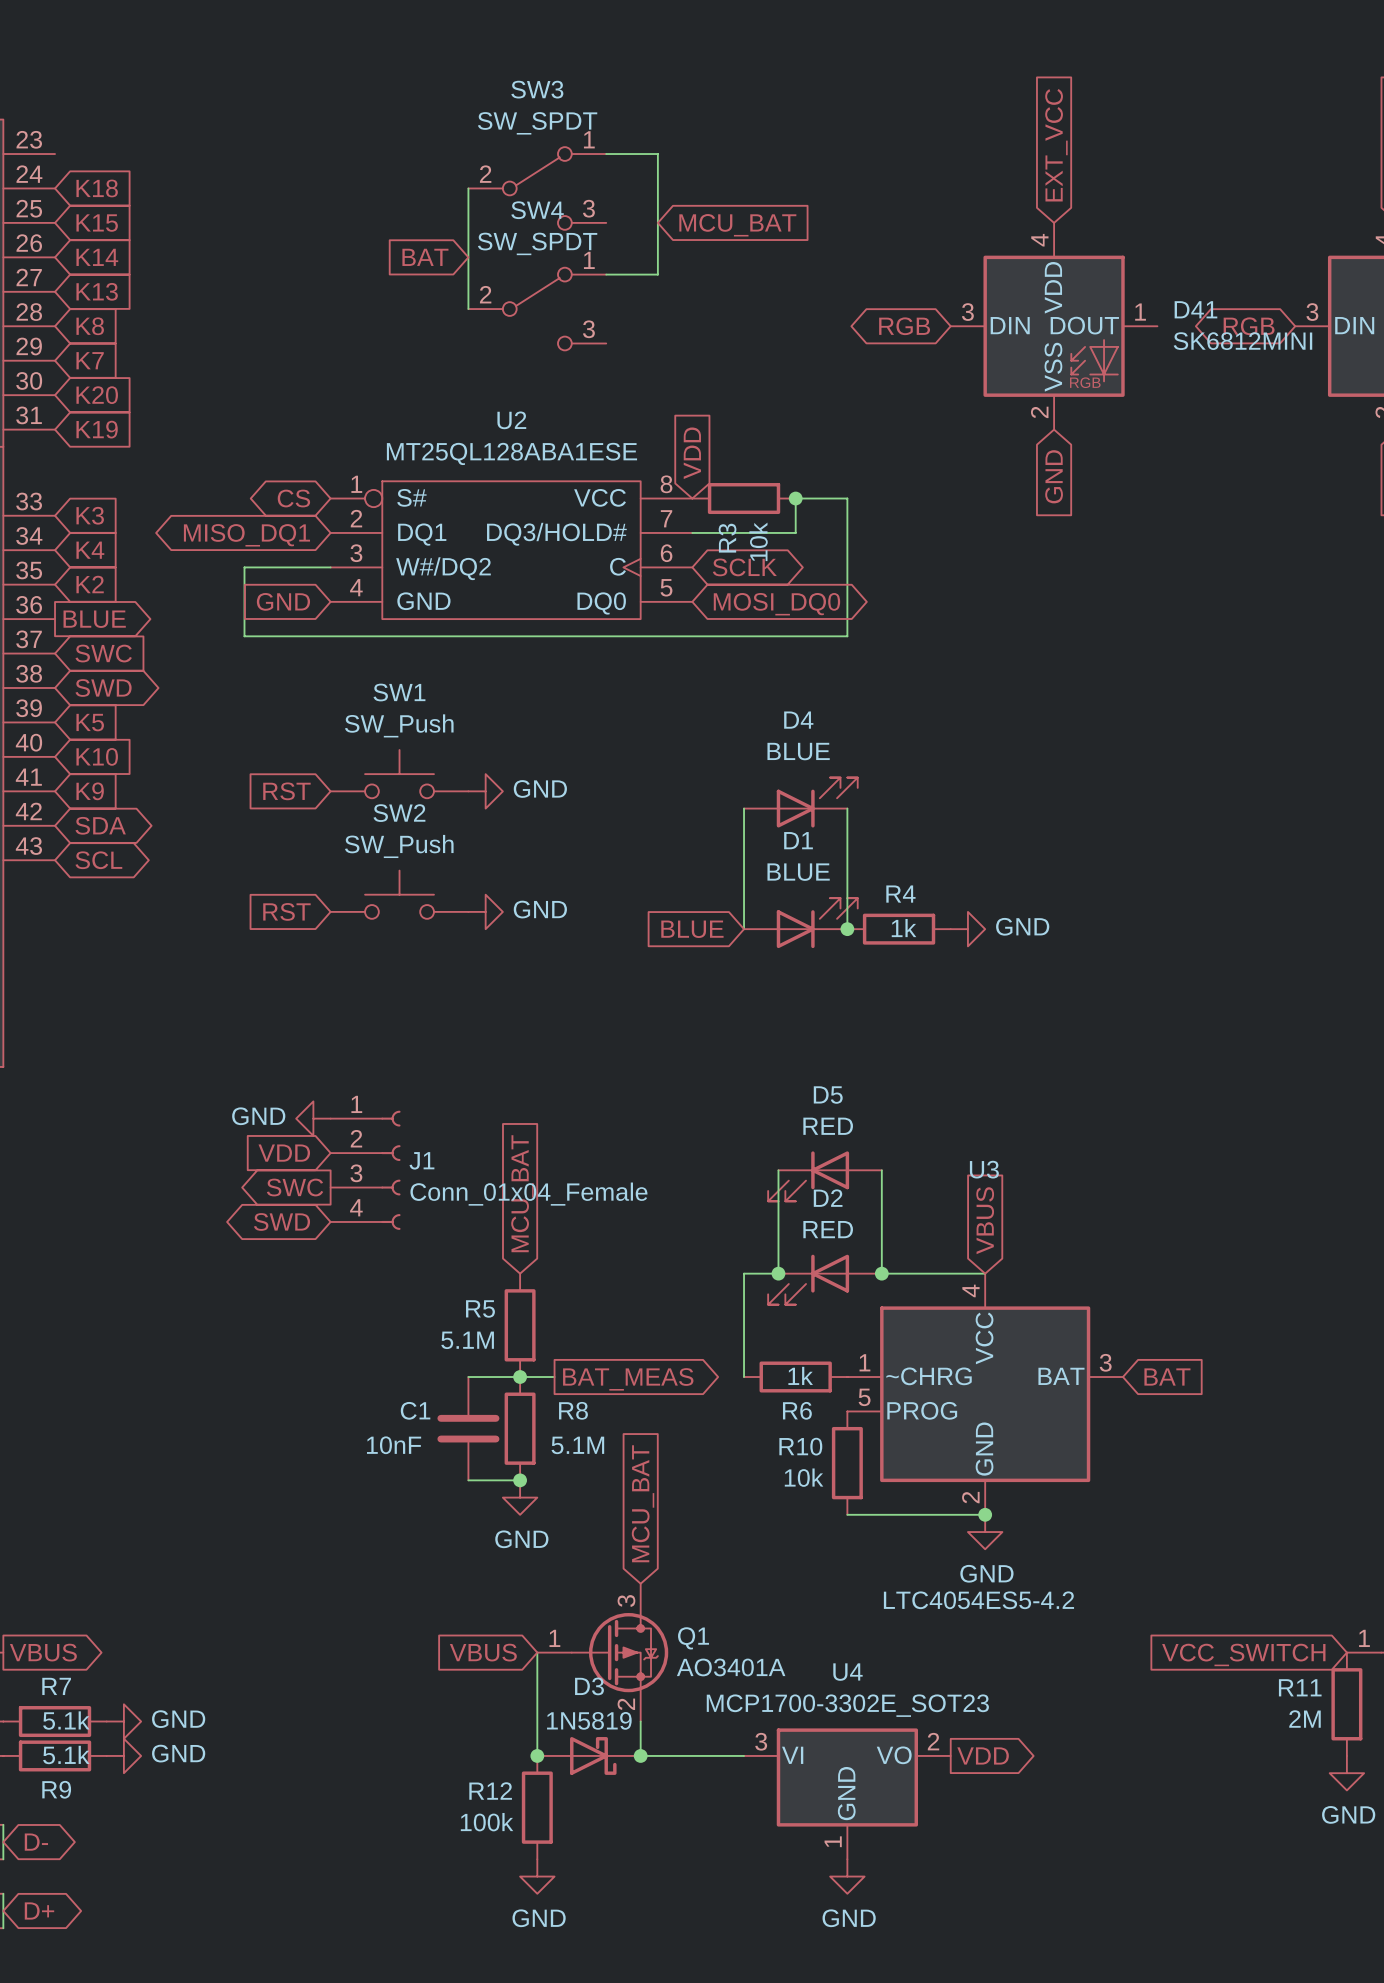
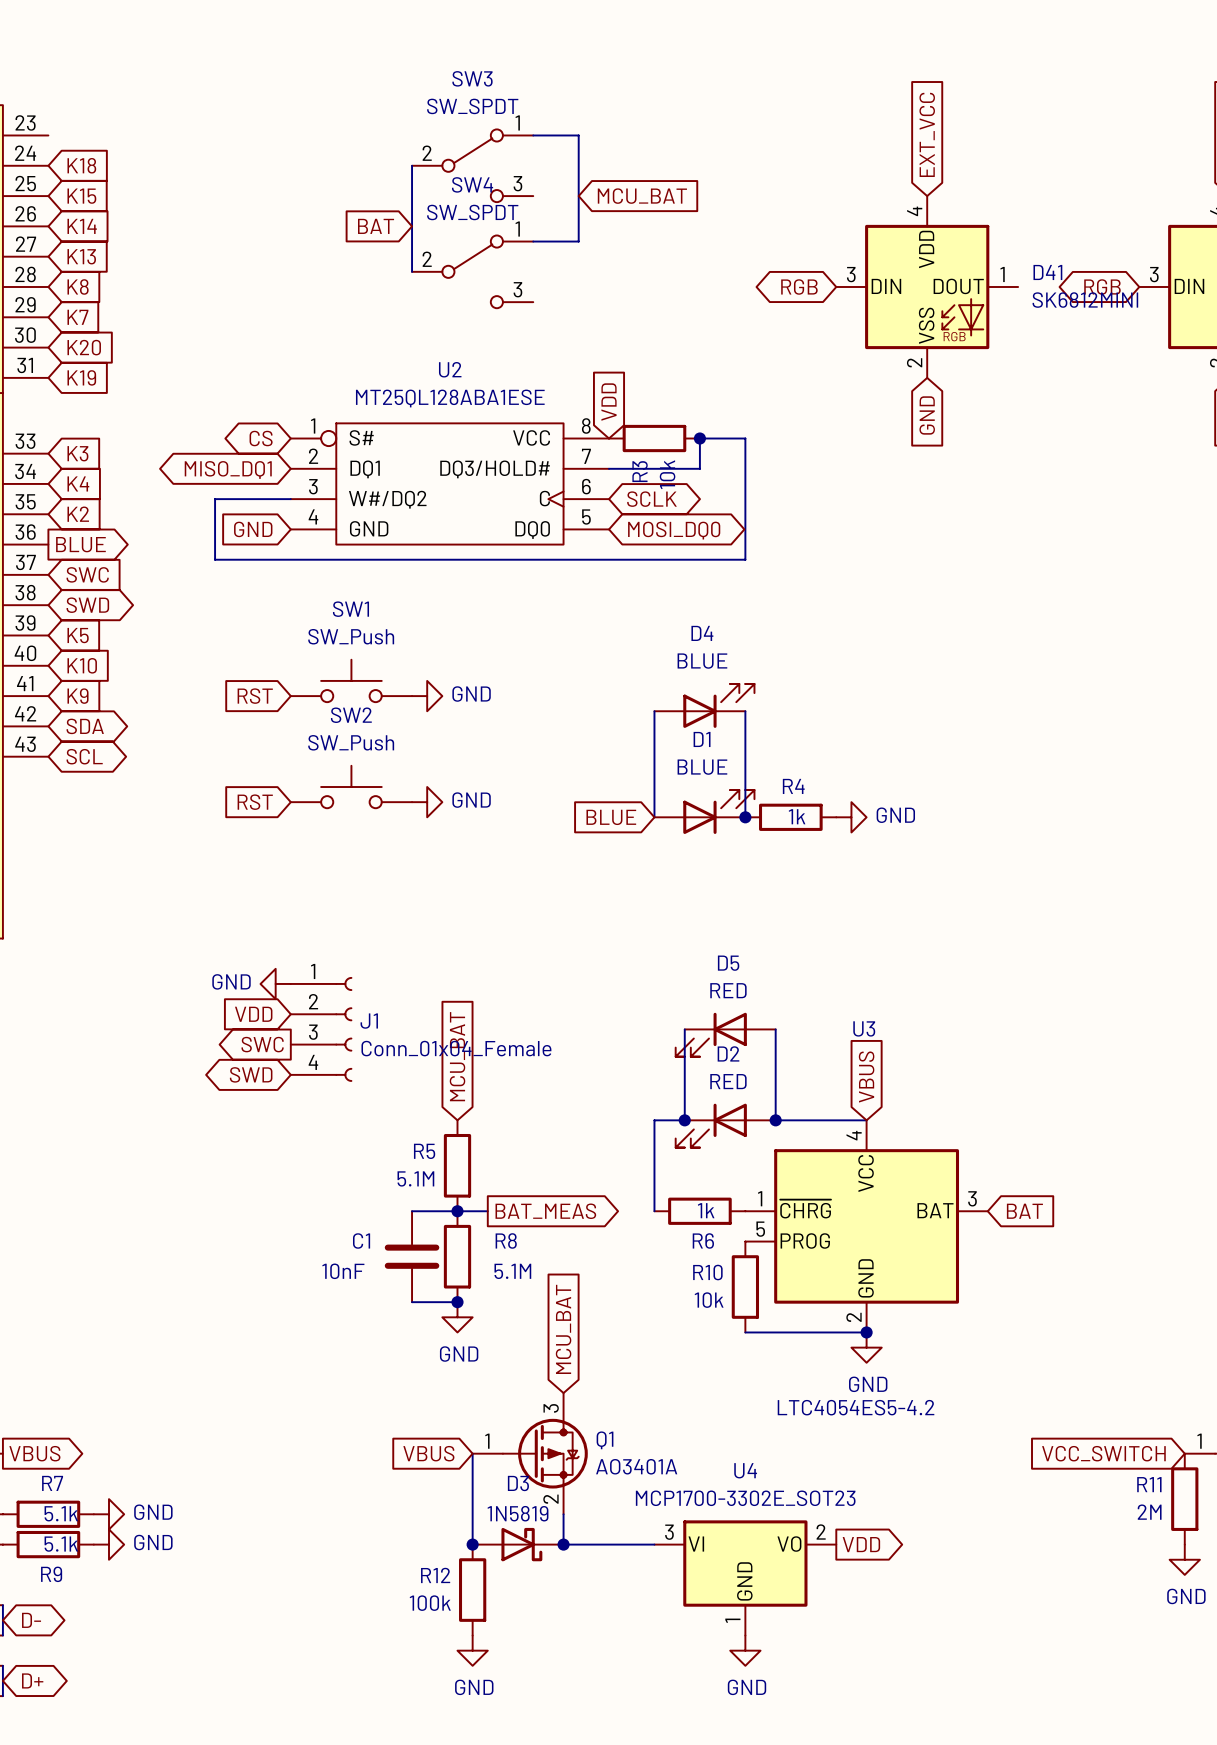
U3 pin name: ~CHRG (929, 1376) -> ~{CHRG} (805, 1209)

